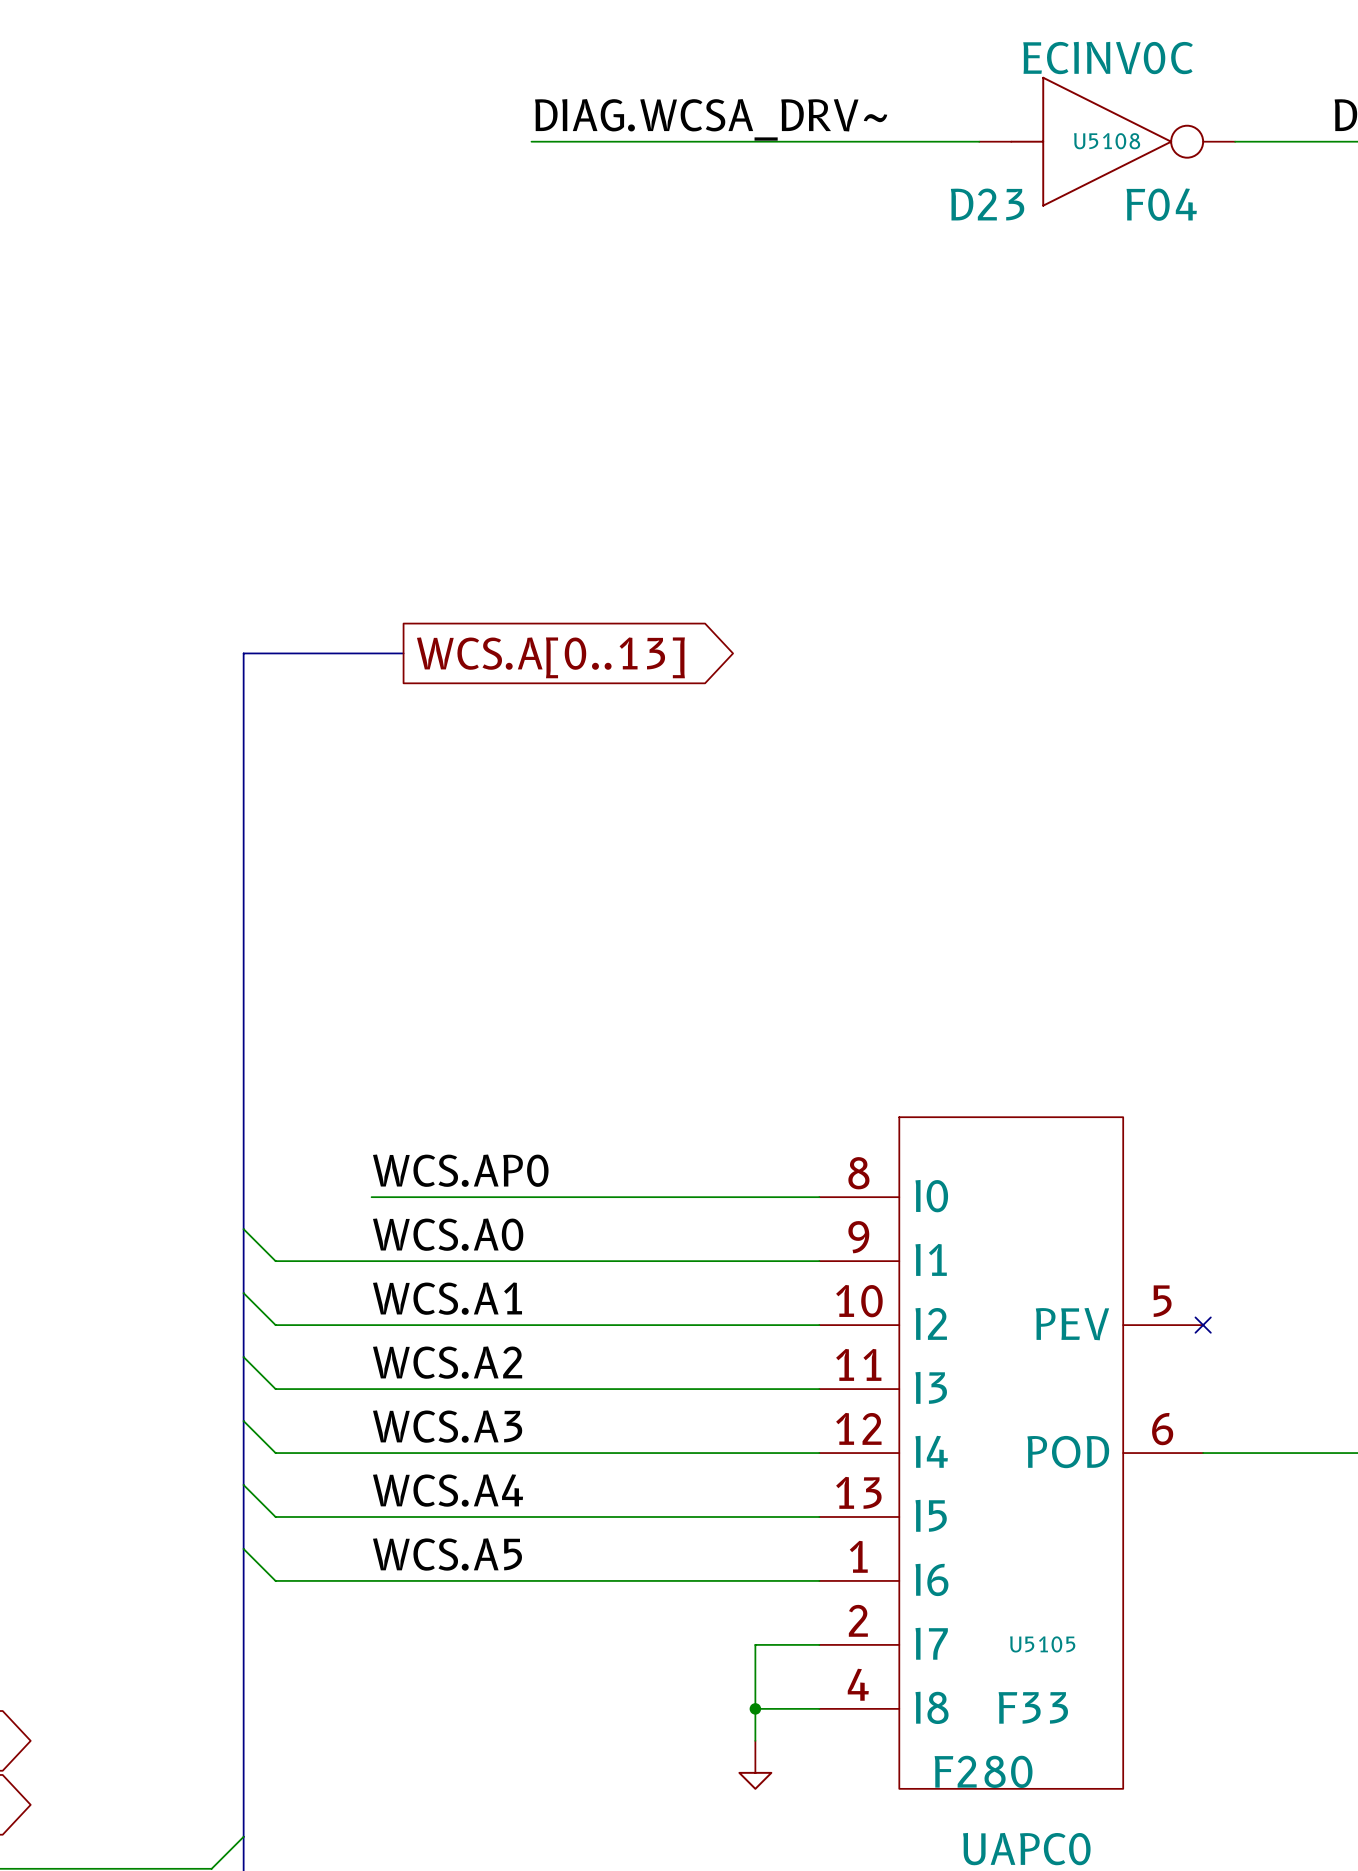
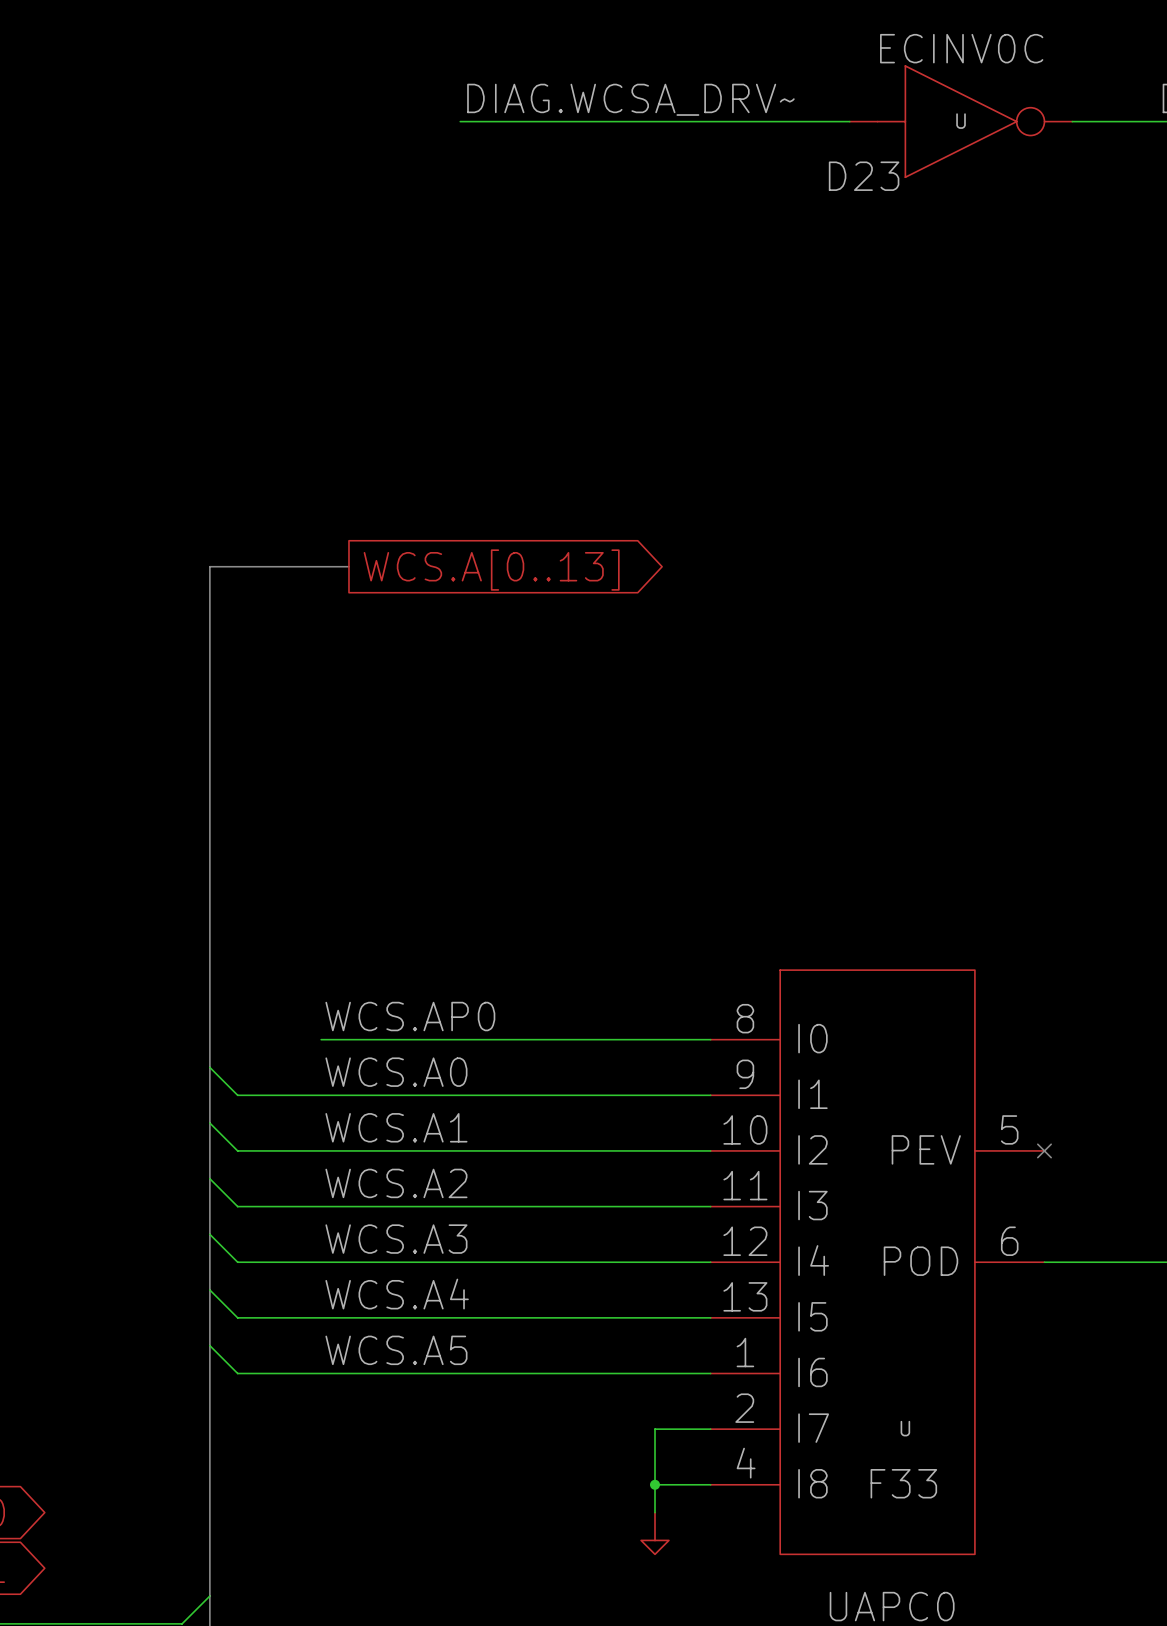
U5108 name: U5108 (1107, 141) -> U (961, 121)
U5108 value: F04 (1161, 204) -> none
U5105 name: U5105 (1042, 1644) -> U (905, 1428)
U5105 value: F280 (983, 1771) -> none

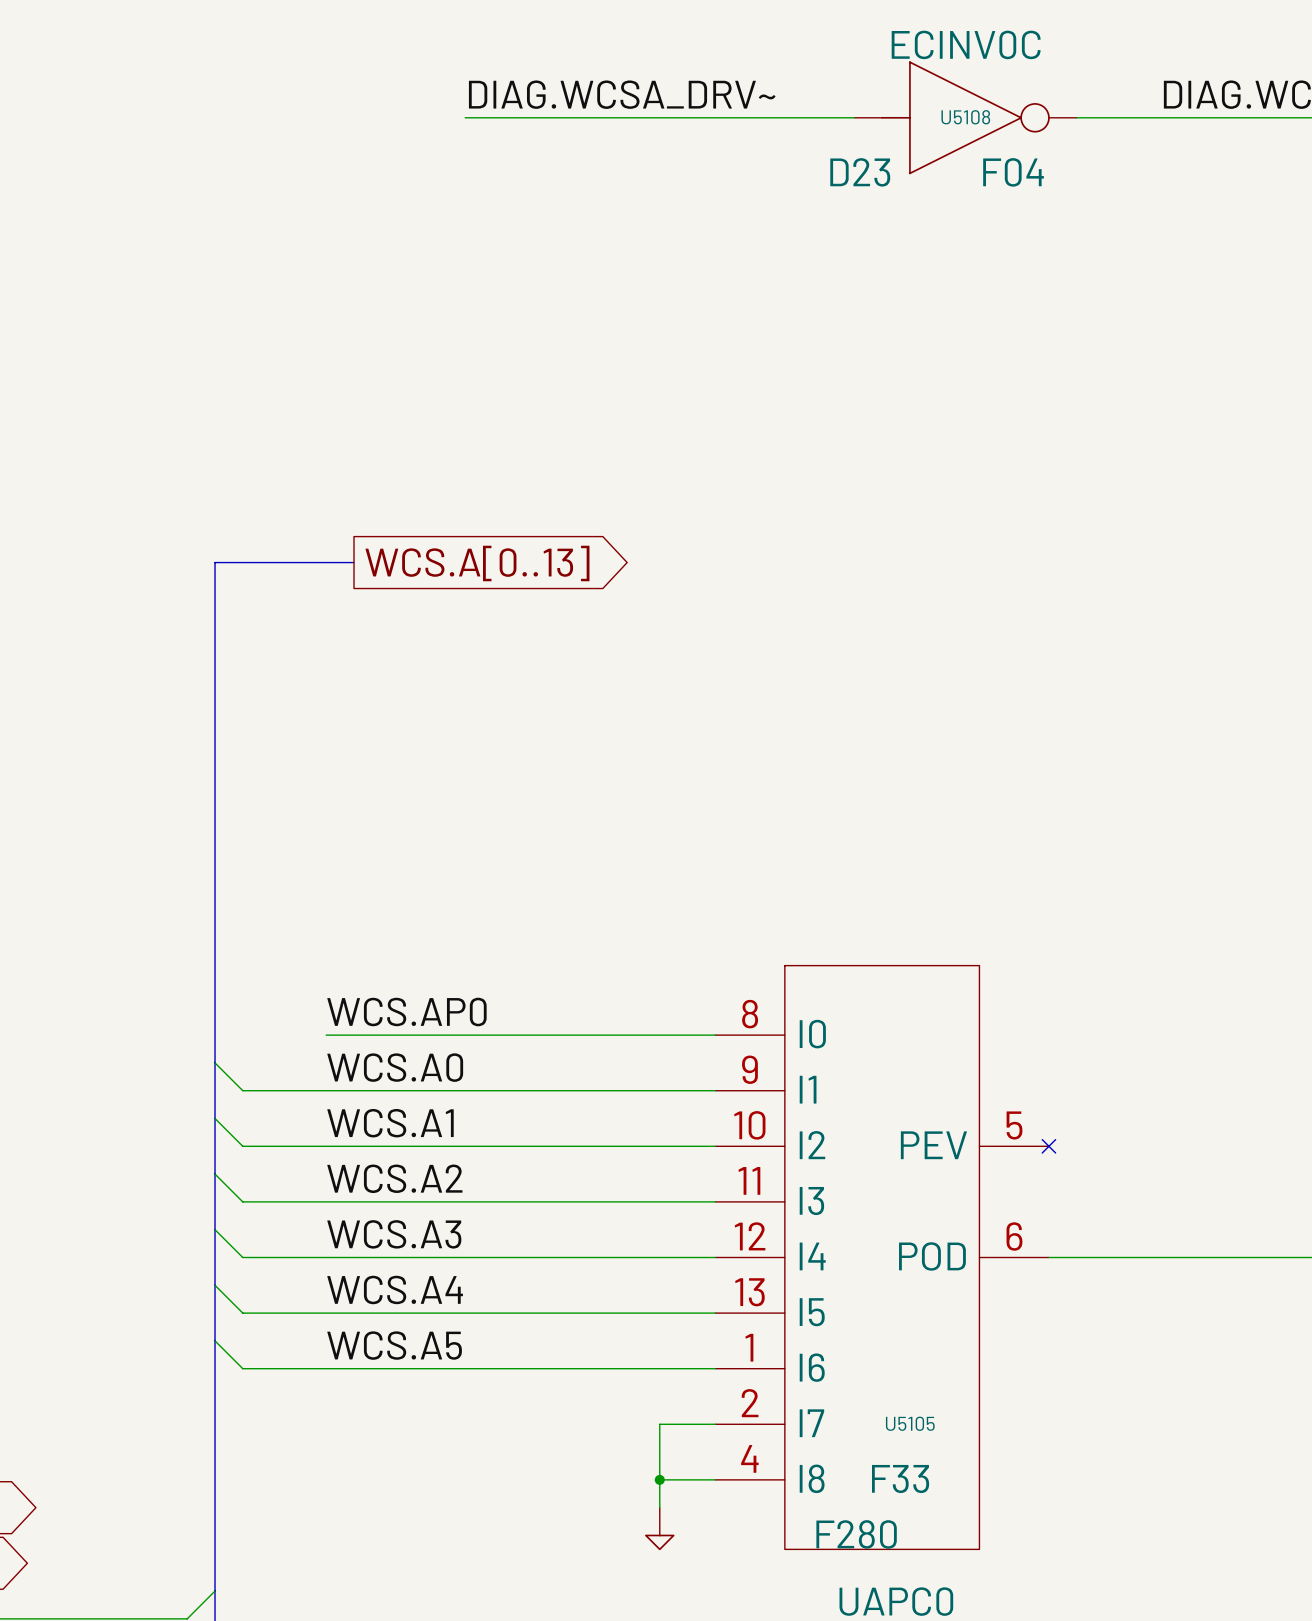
U name: U (961, 121) -> U5108 (965, 117)
U value: none -> F04 (1013, 172)
U name: U (905, 1428) -> U5105 (910, 1423)
U value: none -> F280 (856, 1534)

